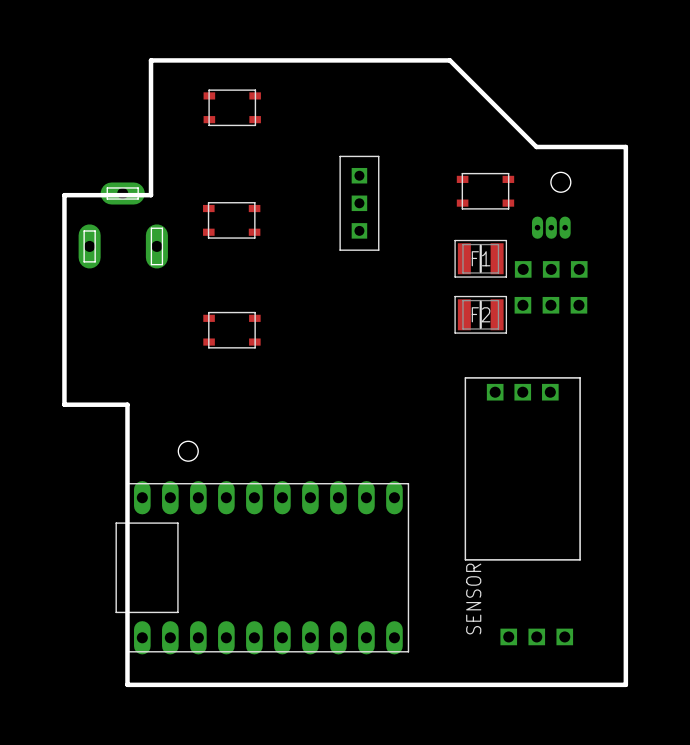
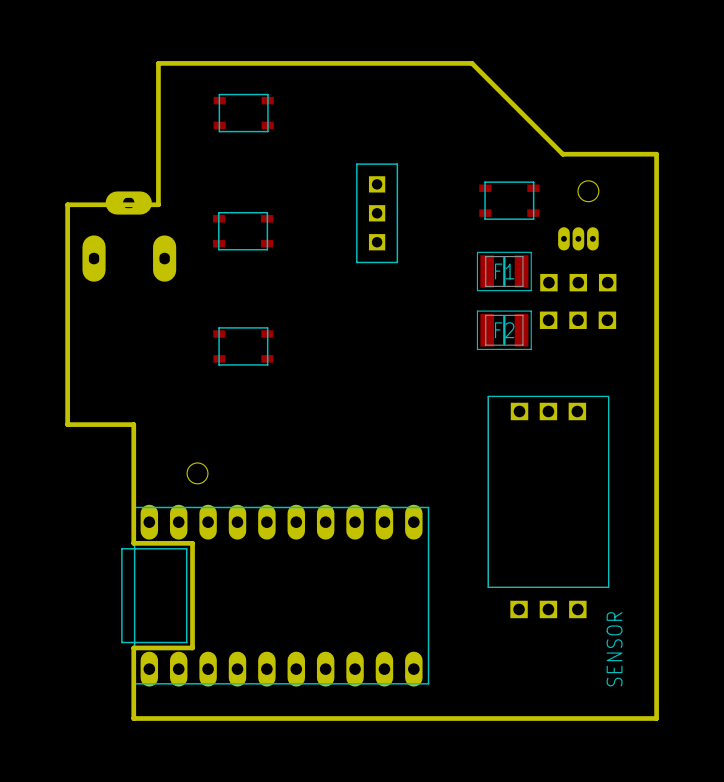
board edge: (127, 517) (127, 617) -> (133, 543) (192, 543) (192, 647) (133, 647)
part: none -> (548, 609)
part: (536, 636) -> none

